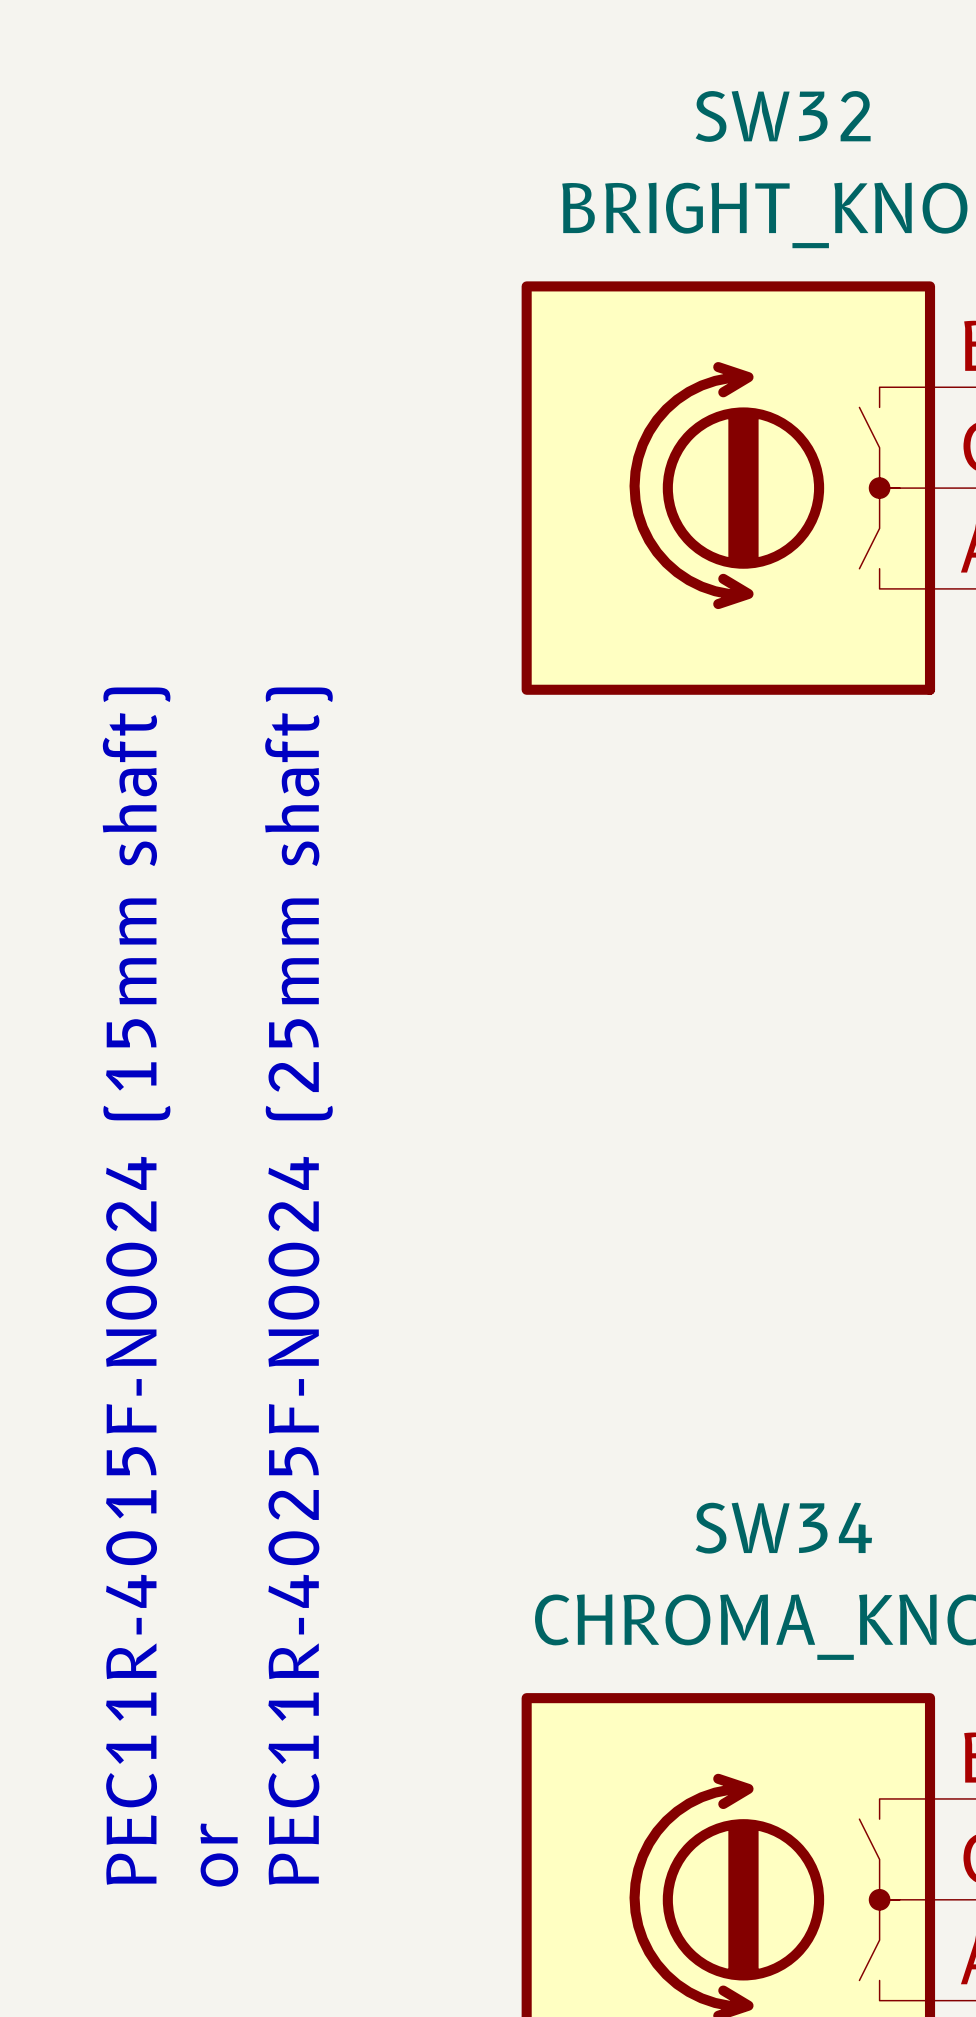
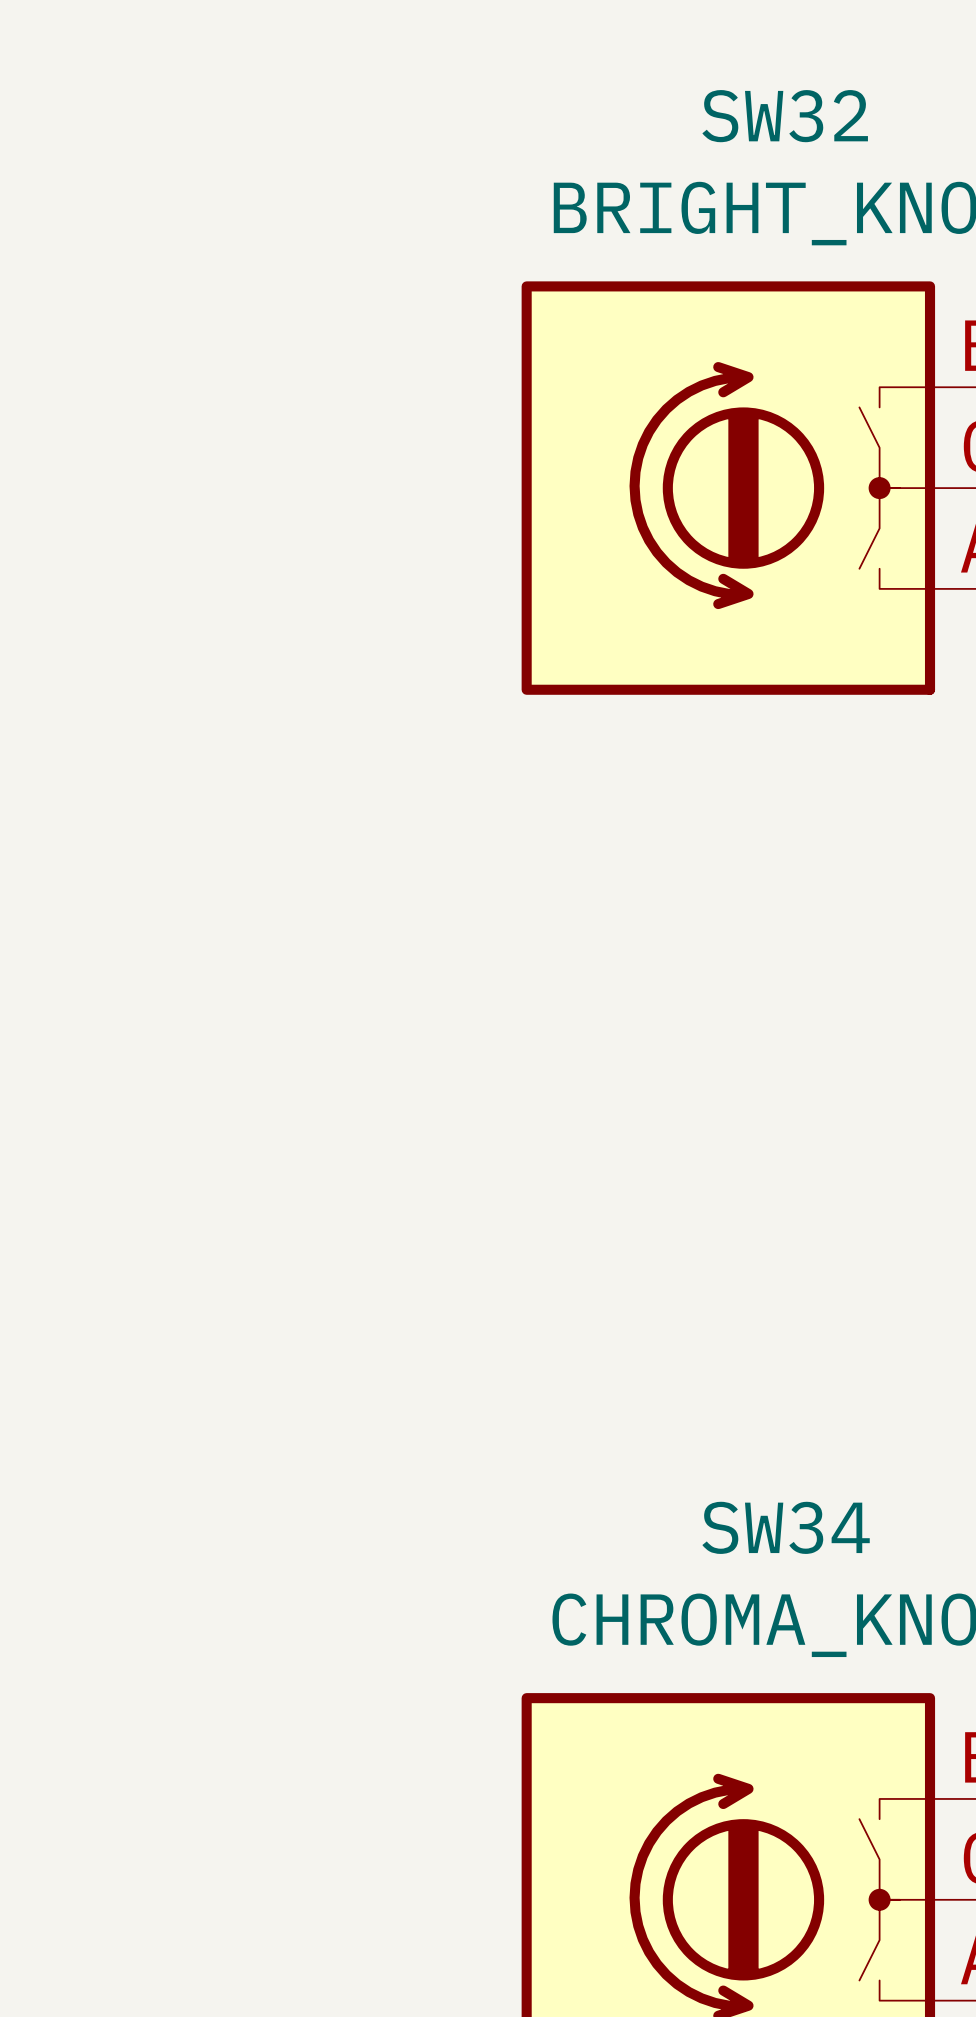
text: PEC11R-4015F-N0024 (15mm shaft) (136, 1286) -> none
text: PEC11R-4025F-N0024 (25mm shaft) (298, 1286) -> none
text: or (219, 1855) -> none

